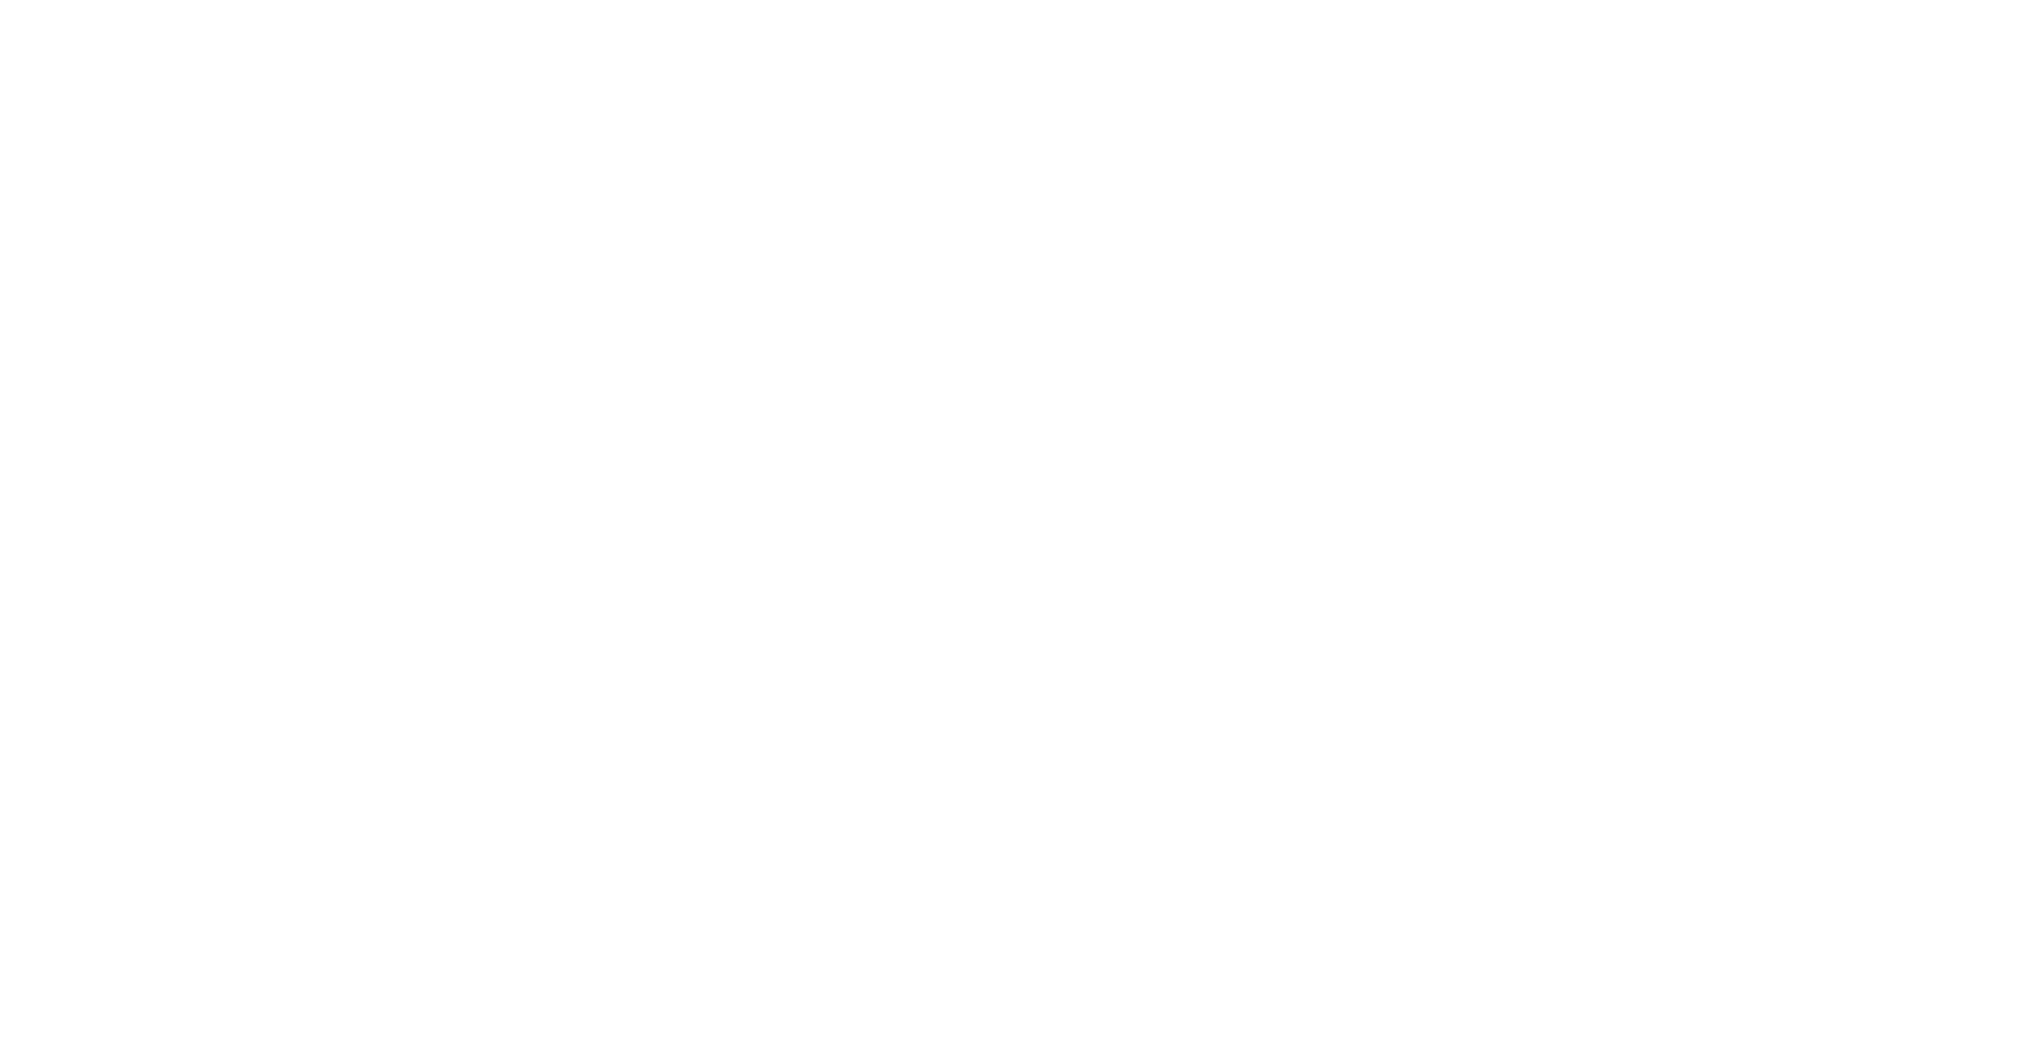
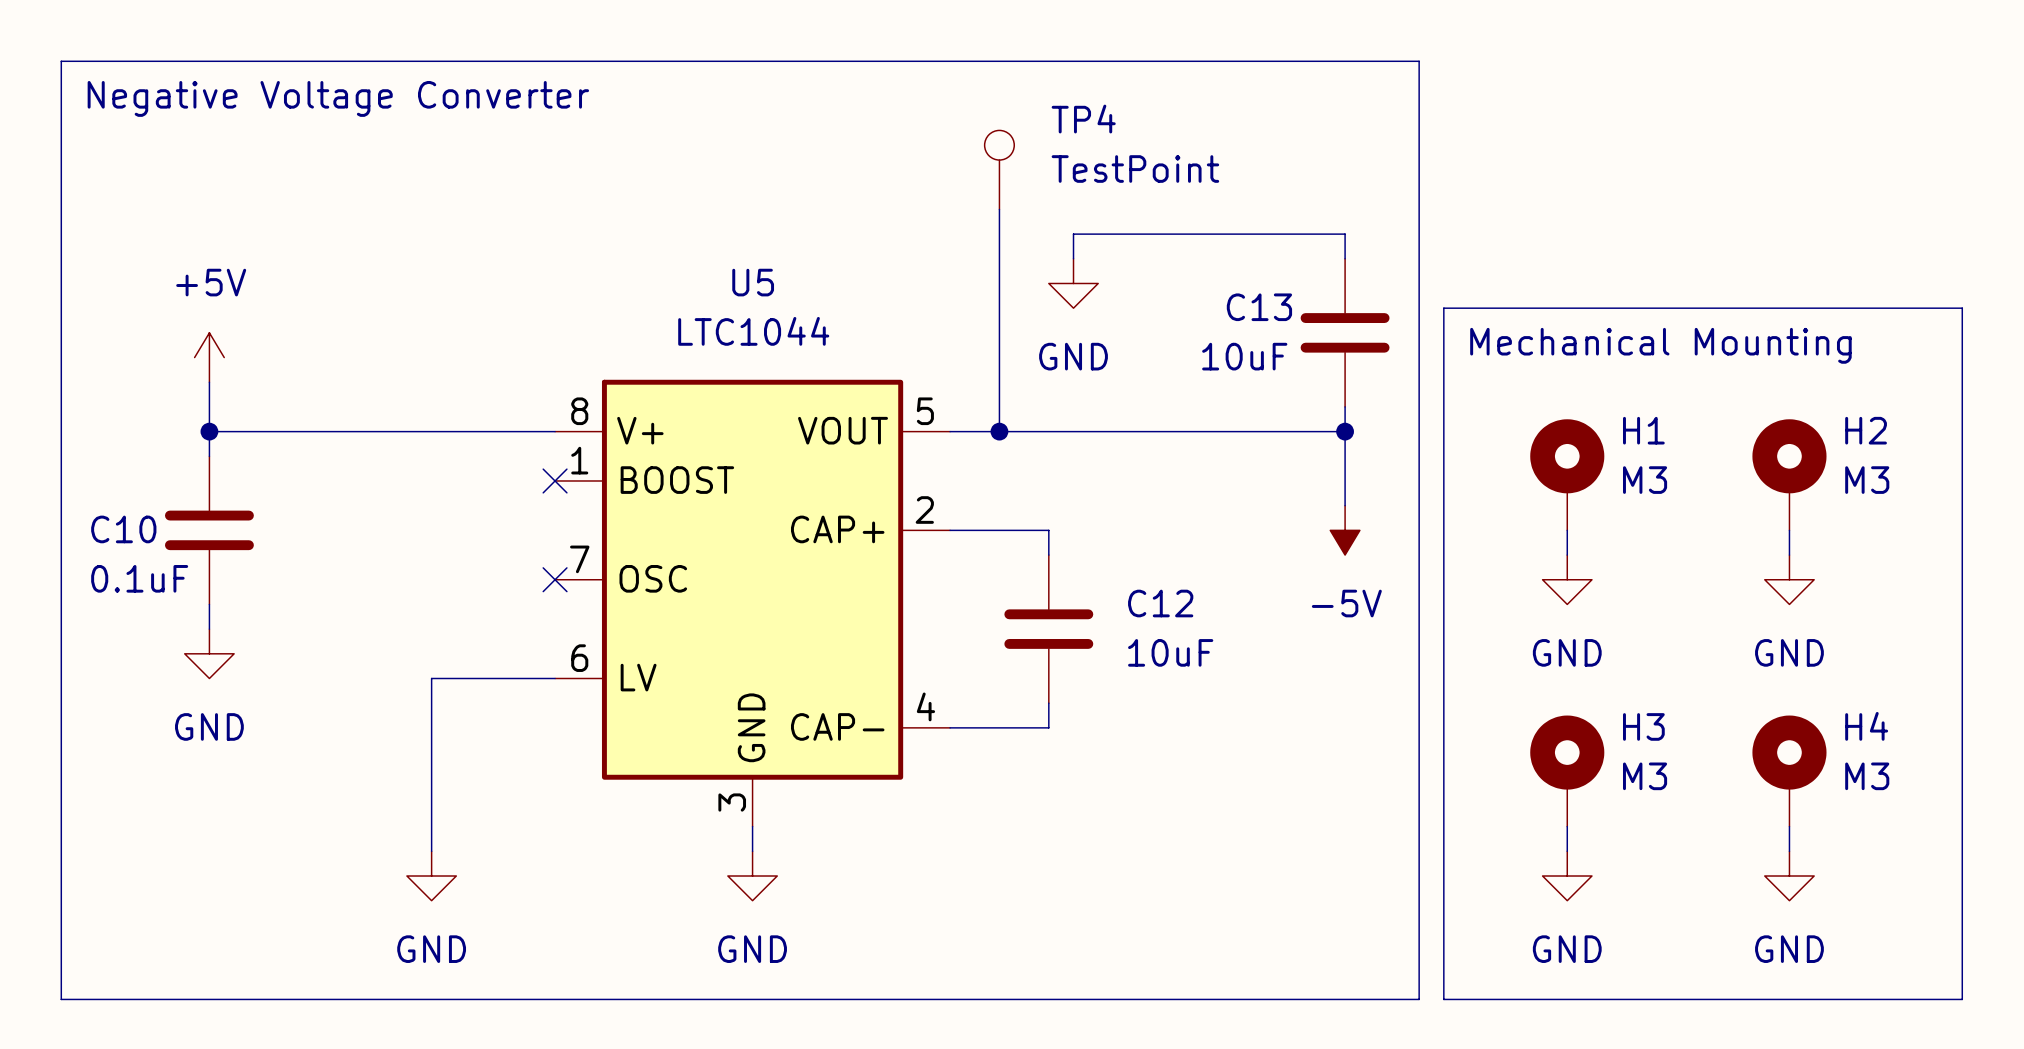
line: none -> (61, 61) (1419, 61) (1419, 999) (61, 999) (61, 61)
text: none -> Negative Voltage Converter (338, 98)
TP4: none -> TestPoint (999, 169)
wire: none -> (999, 209) (999, 431)
wire: none -> (1073, 258) (1073, 234) (1345, 234) (1345, 258)
power symbol: none -> GND (1073, 283)
line: none -> (1443, 308) (1962, 308) (1962, 999) (1443, 999) (1443, 308)
C13: none -> 10uF (1345, 332)
text: none -> Mechanical Mounting (1660, 345)
power symbol: none -> +5V (209, 357)
wire: none -> (209, 382) (209, 456)
wire: none -> (1345, 406) (1345, 505)
wire: none -> (209, 431) (555, 431)
junction: none -> (209, 431)
wire: none -> (950, 431) (1345, 431)
junction: none -> (999, 431)
junction: none -> (1345, 431)
H1: none -> M3 (1567, 474)
H2: none -> M3 (1789, 474)
no-connect mark: none -> (555, 480)
C10: none -> 0.1uF (209, 530)
wire: none -> (950, 530) (1048, 530) (1048, 555)
power symbol: none -> -5V (1345, 530)
wire: none -> (1567, 530) (1567, 555)
wire: none -> (1789, 530) (1789, 555)
no-connect mark: none -> (555, 579)
power symbol: none -> GND (1567, 579)
power symbol: none -> GND (1789, 579)
U5: none -> LTC1044 (752, 603)
wire: none -> (209, 604) (209, 629)
C12: none -> 10uF (1048, 629)
power symbol: none -> GND (209, 653)
wire: none -> (555, 678) (431, 678) (431, 851)
wire: none -> (1048, 703) (1048, 727) (950, 727)
H3: none -> M3 (1567, 771)
H4: none -> M3 (1789, 771)
wire: none -> (752, 826) (752, 851)
wire: none -> (1567, 826) (1567, 851)
wire: none -> (1789, 826) (1789, 851)
power symbol: none -> GND (431, 876)
power symbol: none -> GND (752, 876)
power symbol: none -> GND (1567, 876)
power symbol: none -> GND (1789, 876)

